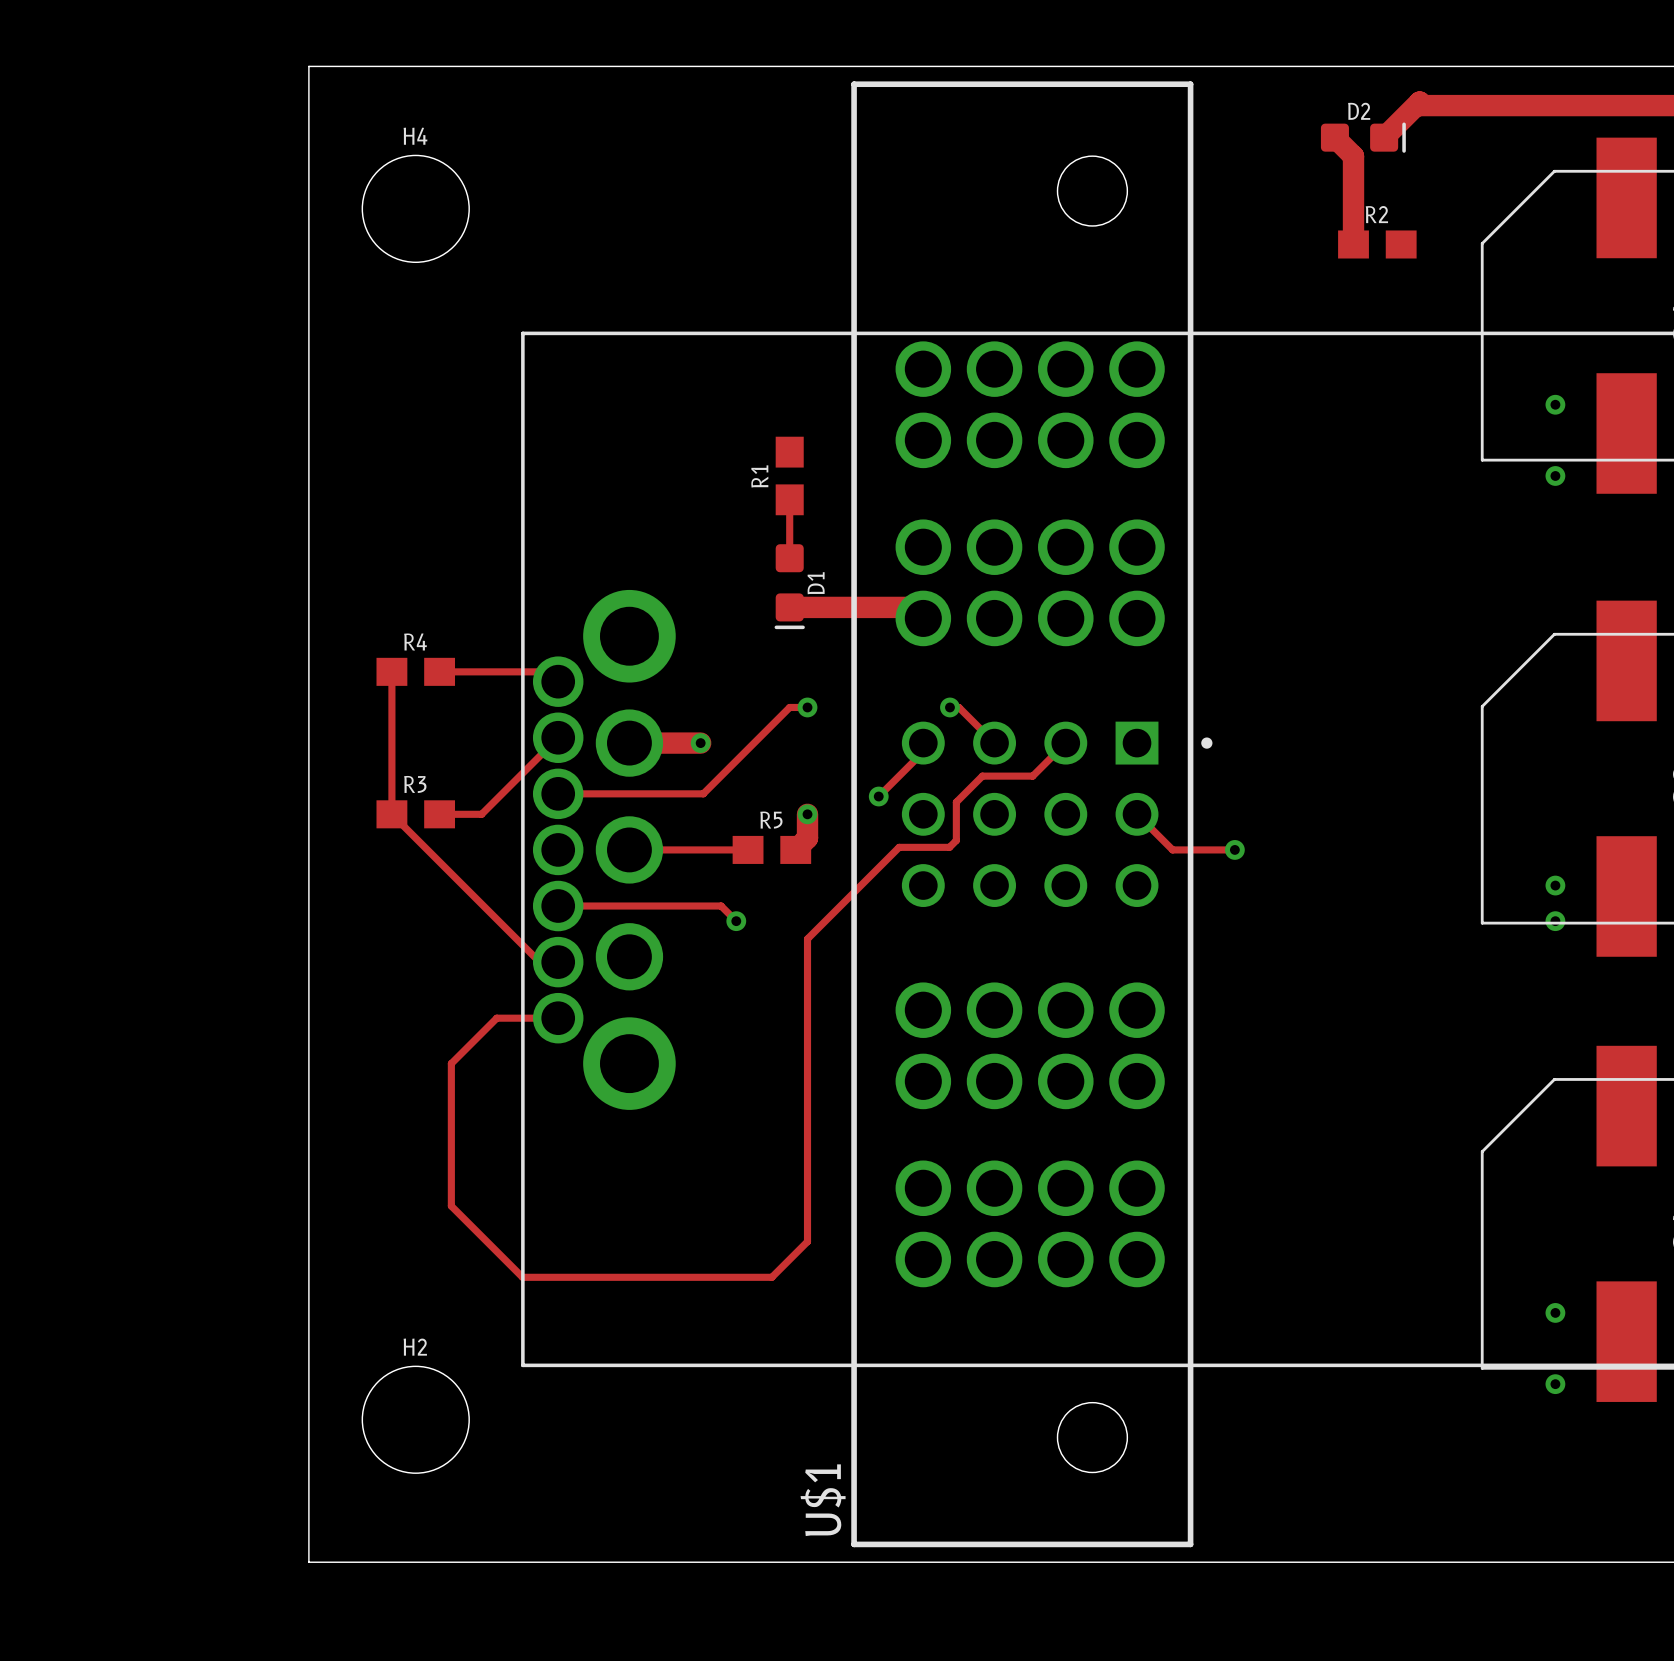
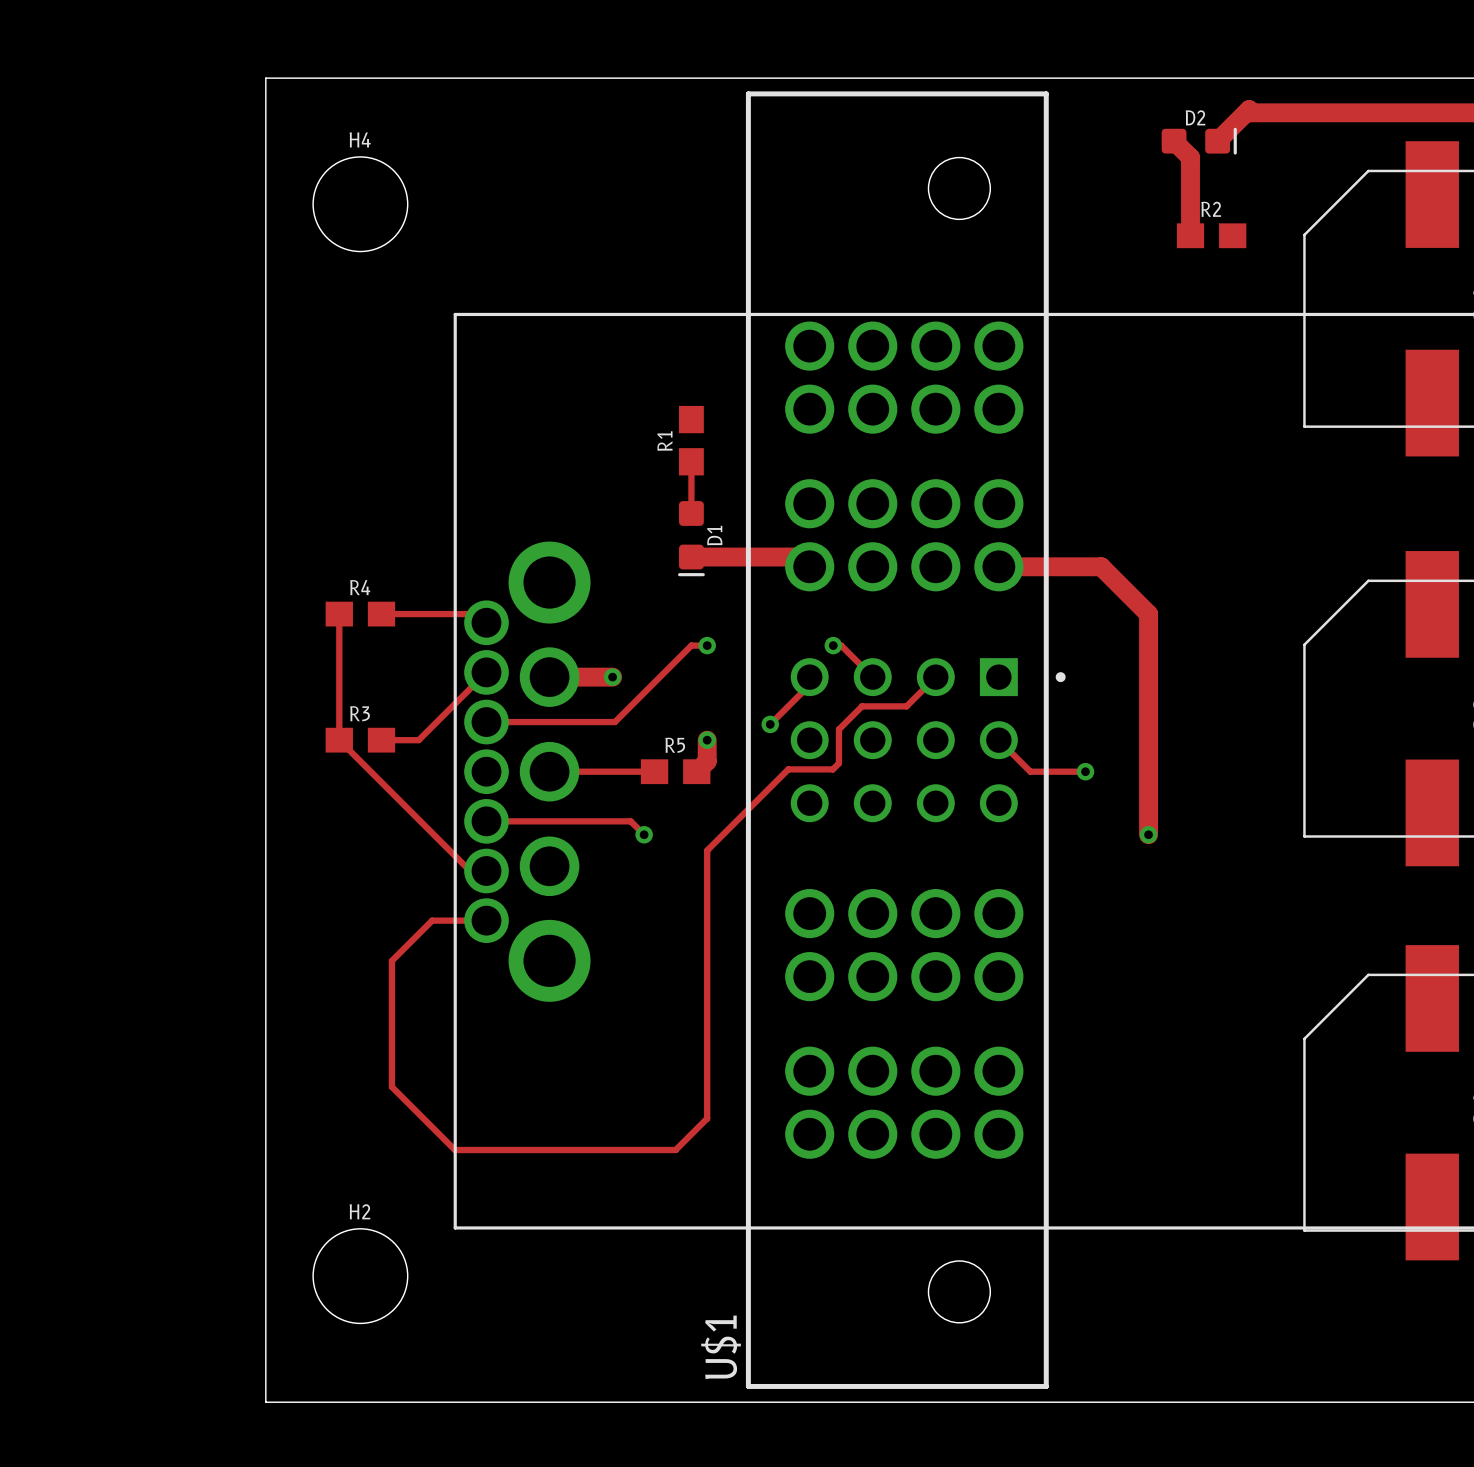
via: (1555, 404) -> none
via: (1555, 475) -> none
track: none -> (998, 566) (1101, 566) (1148, 614) (1148, 834)
via: (1555, 885) -> none
via: none -> (1148, 834)
via: (1555, 921) -> none
via: (1555, 1312) -> none
via: (1555, 1384) -> none

